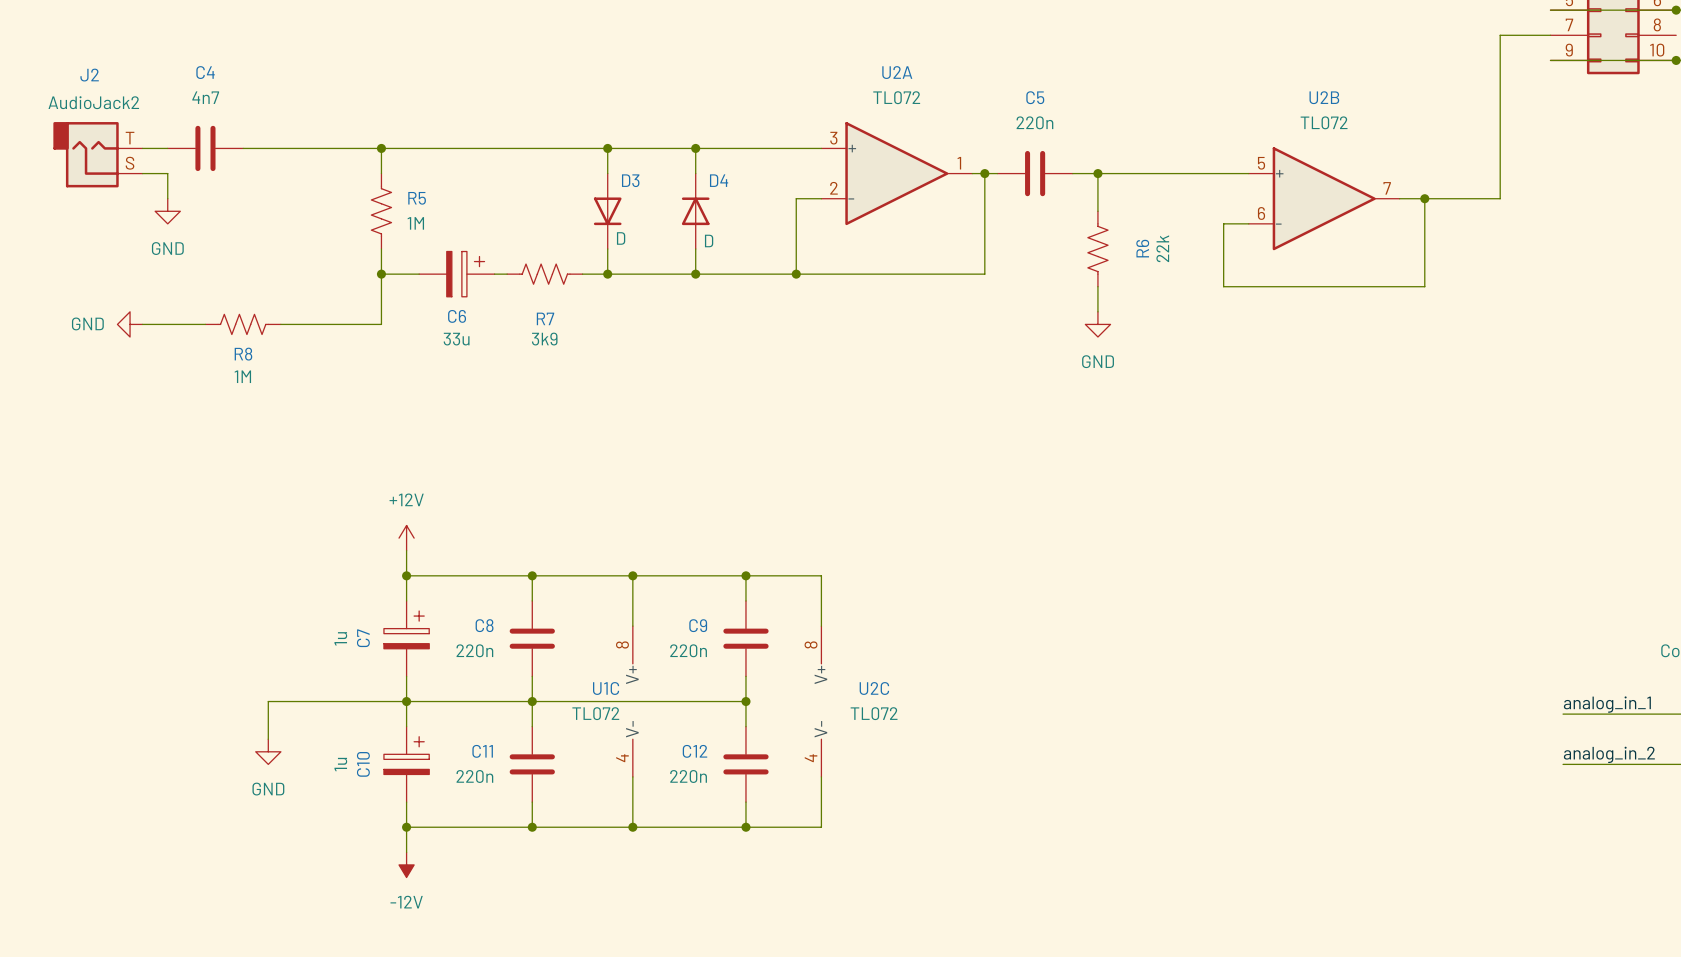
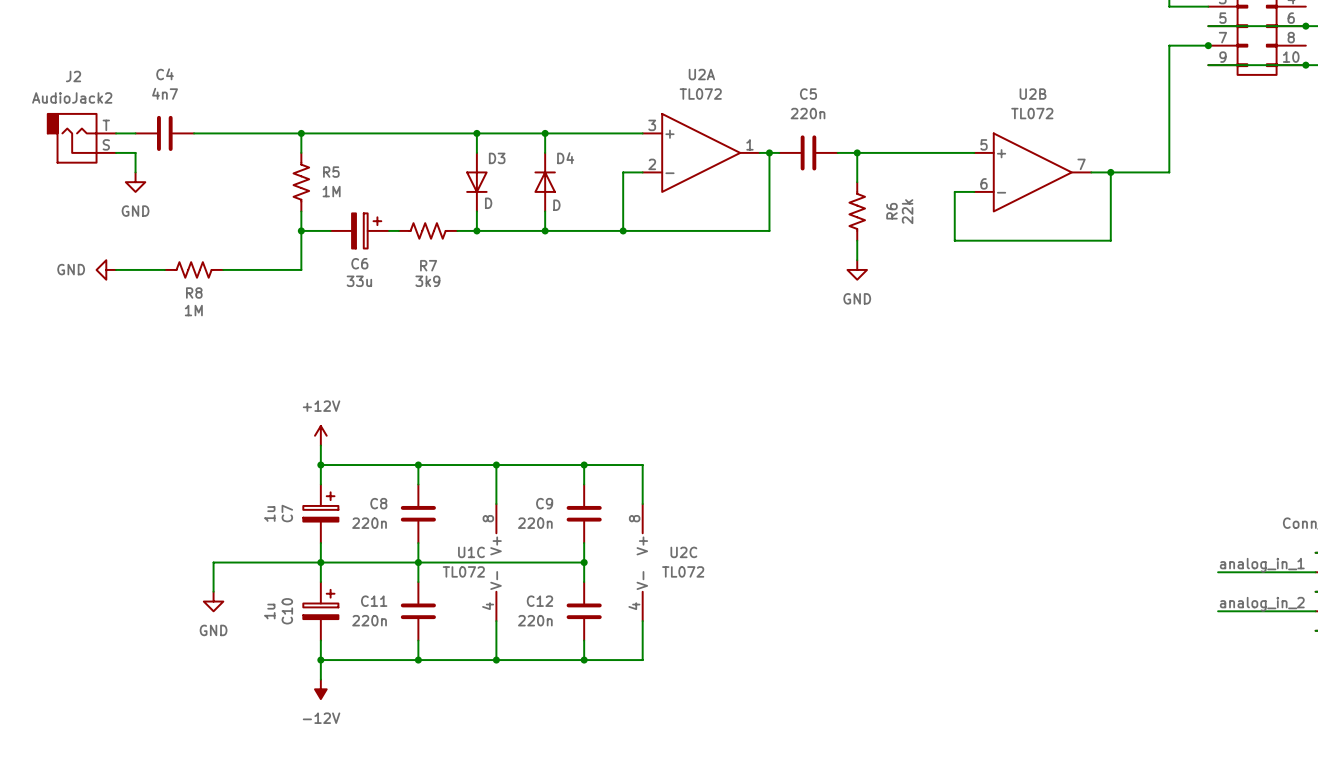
junction: none -> (1208, 45)

